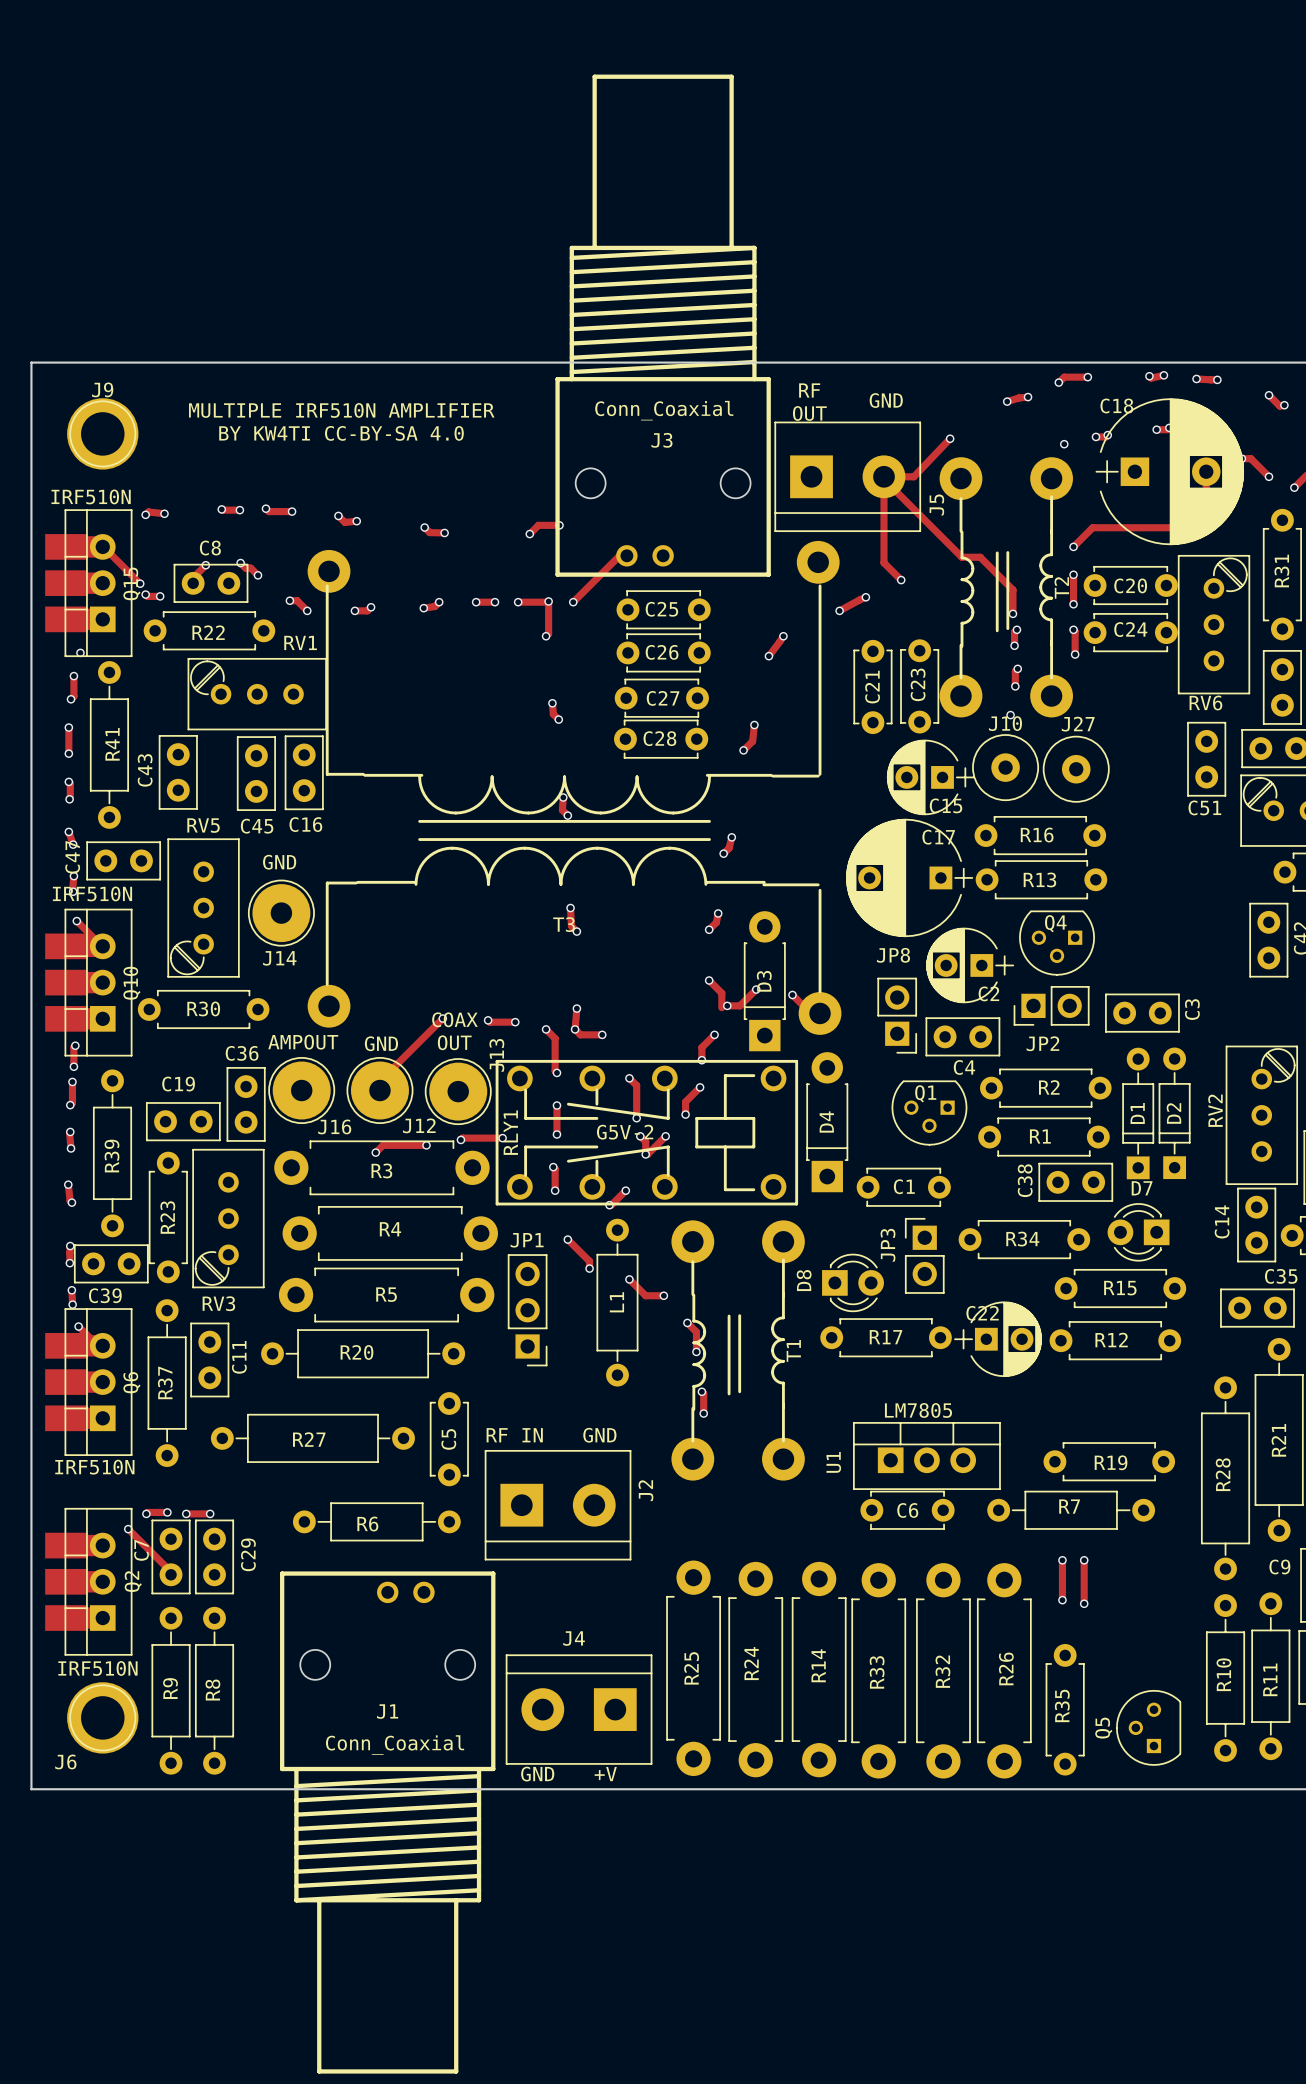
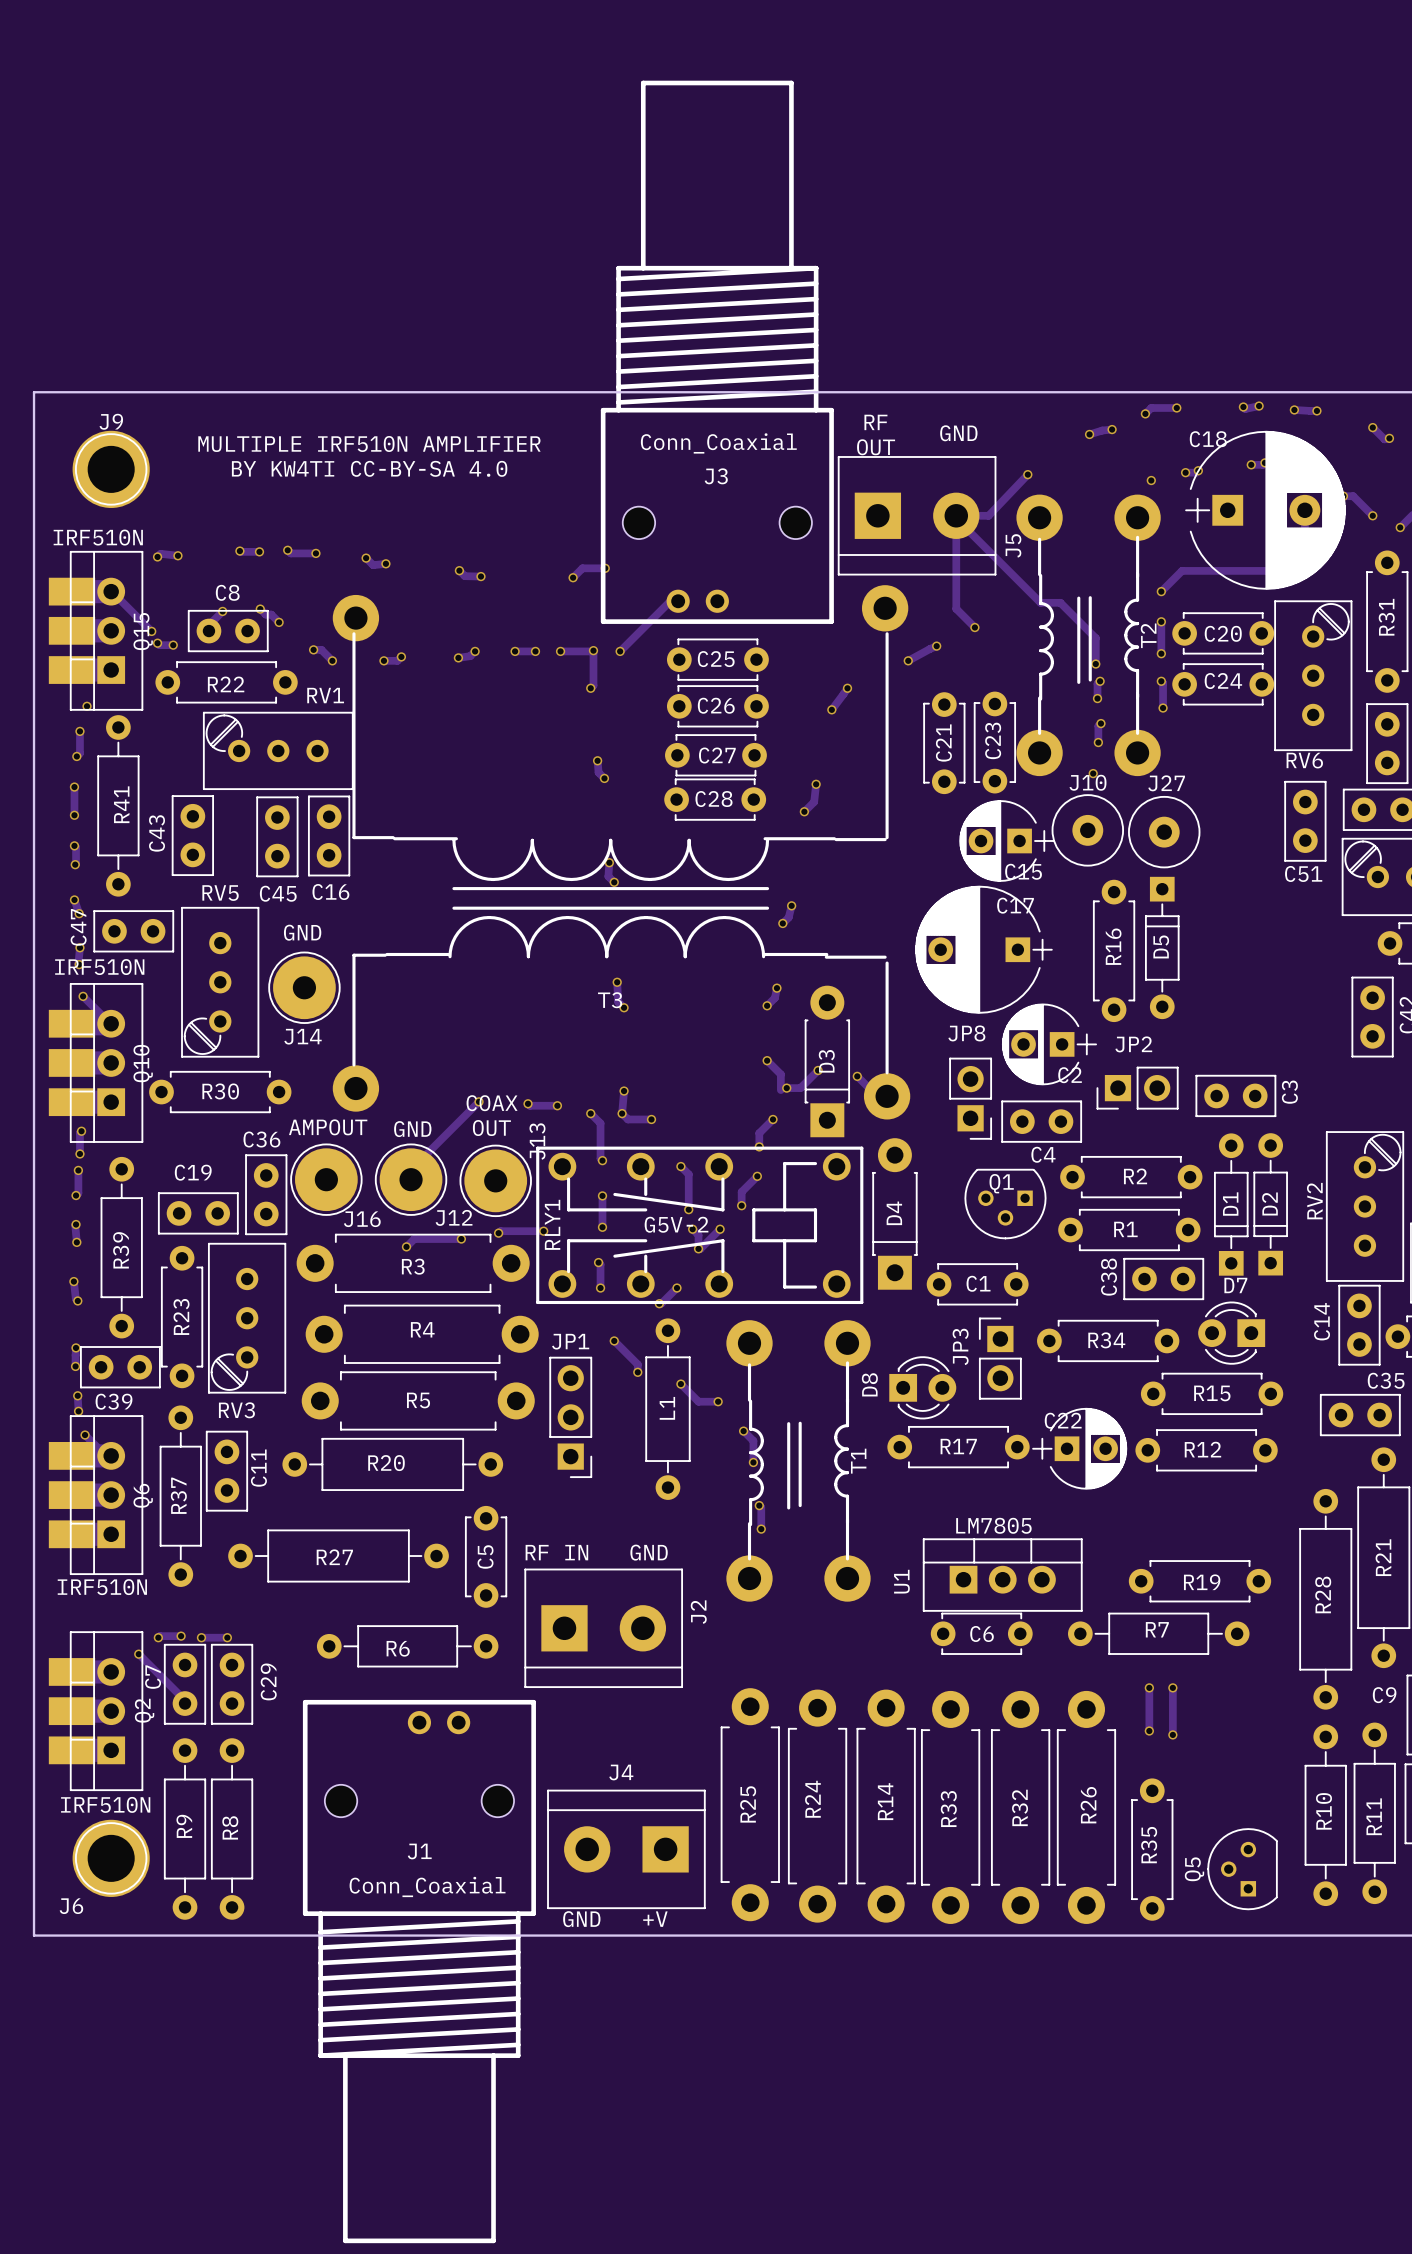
R16 rotation: 0° (1040, 835) -> 90° clockwise (1114, 950)
D5: none -> (1162, 947)
R13: (1041, 879) -> none
Q4: (1057, 943) -> none
JP2 name position: JP2 (1042, 1043) -> JP2 (1133, 1044)

